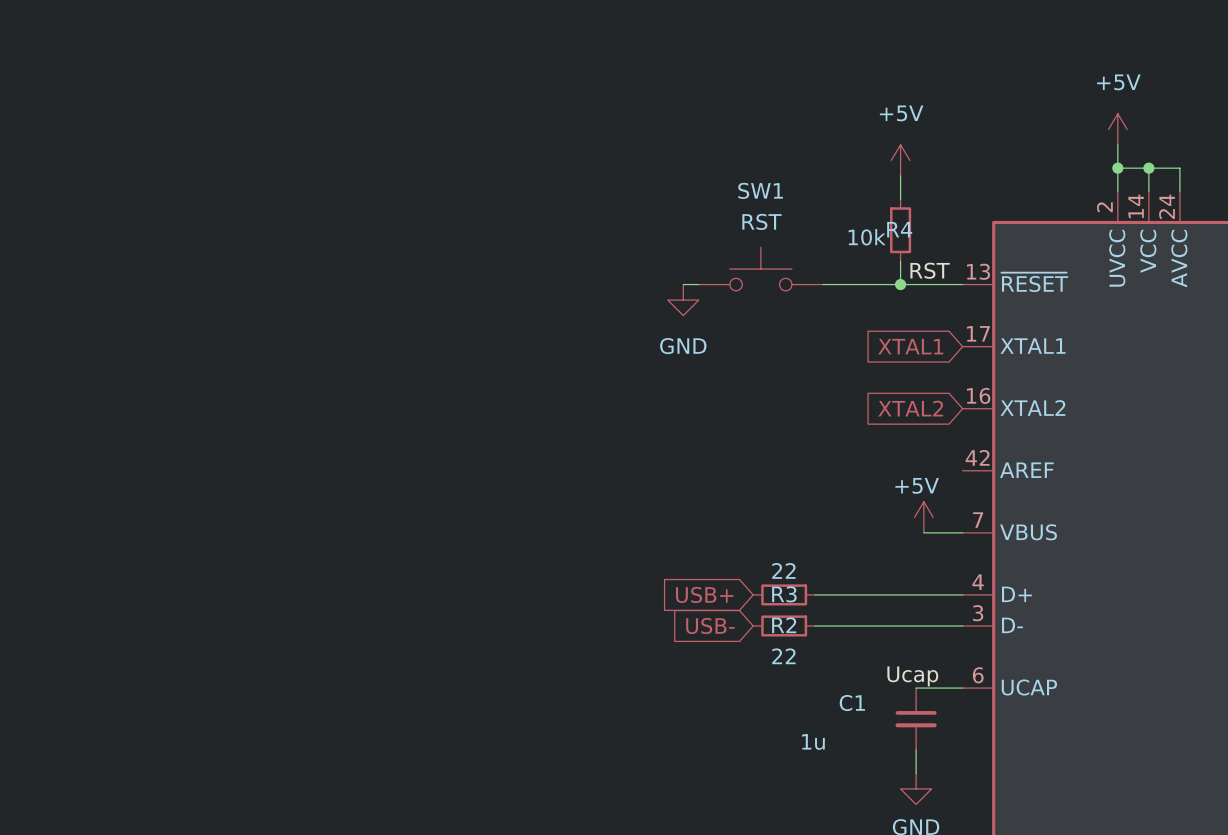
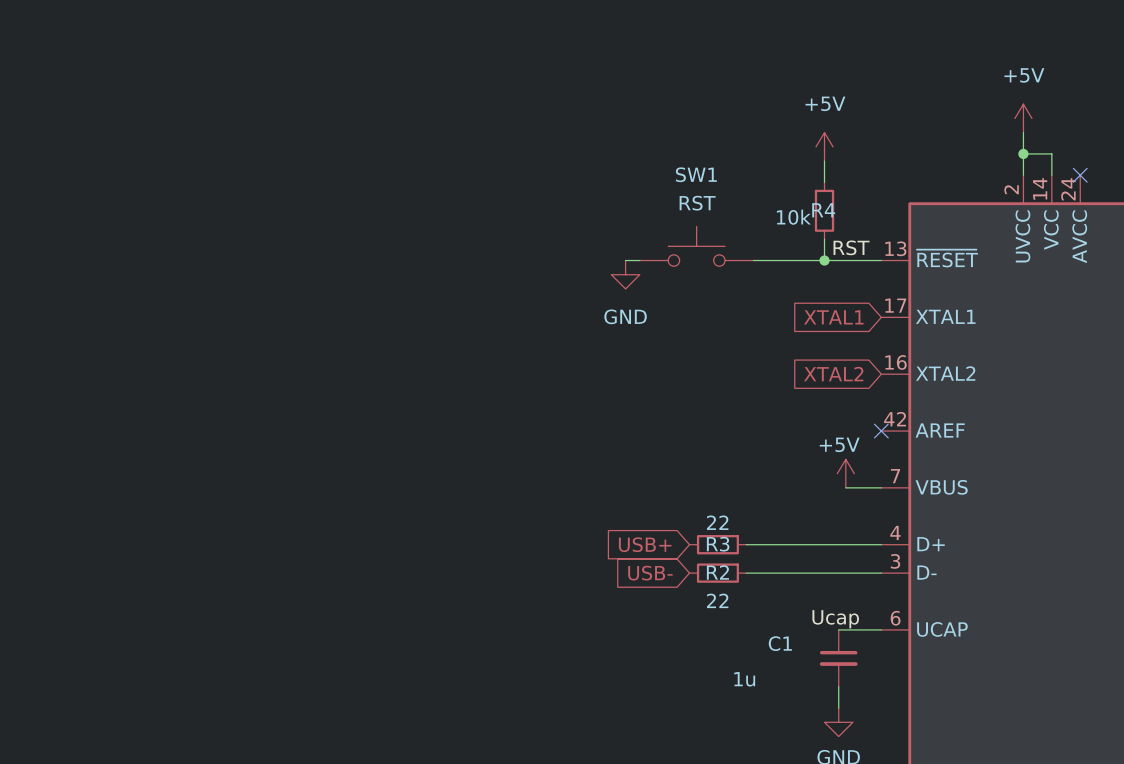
wire: (1148, 168) (1179, 168) (1179, 191) -> none
junction: (1148, 168) -> none
no-connect mark: none -> (1080, 175)
no-connect mark: none -> (881, 431)

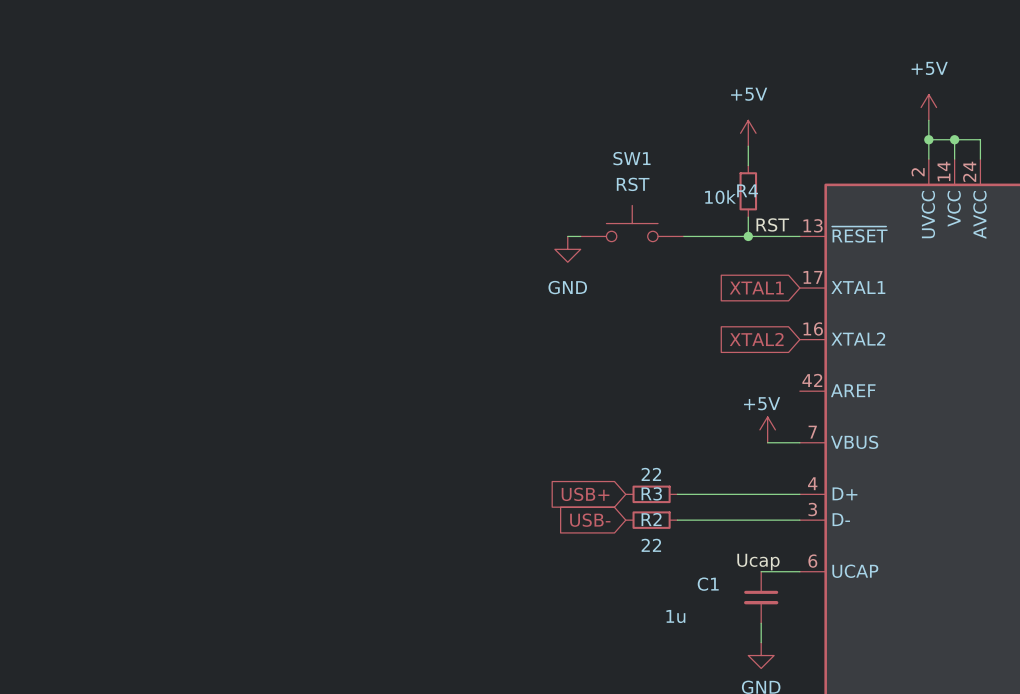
wire: none -> (954, 139) (980, 139) (980, 159)
junction: none -> (954, 139)
no-connect mark: (1080, 175) -> none
no-connect mark: (881, 431) -> none

